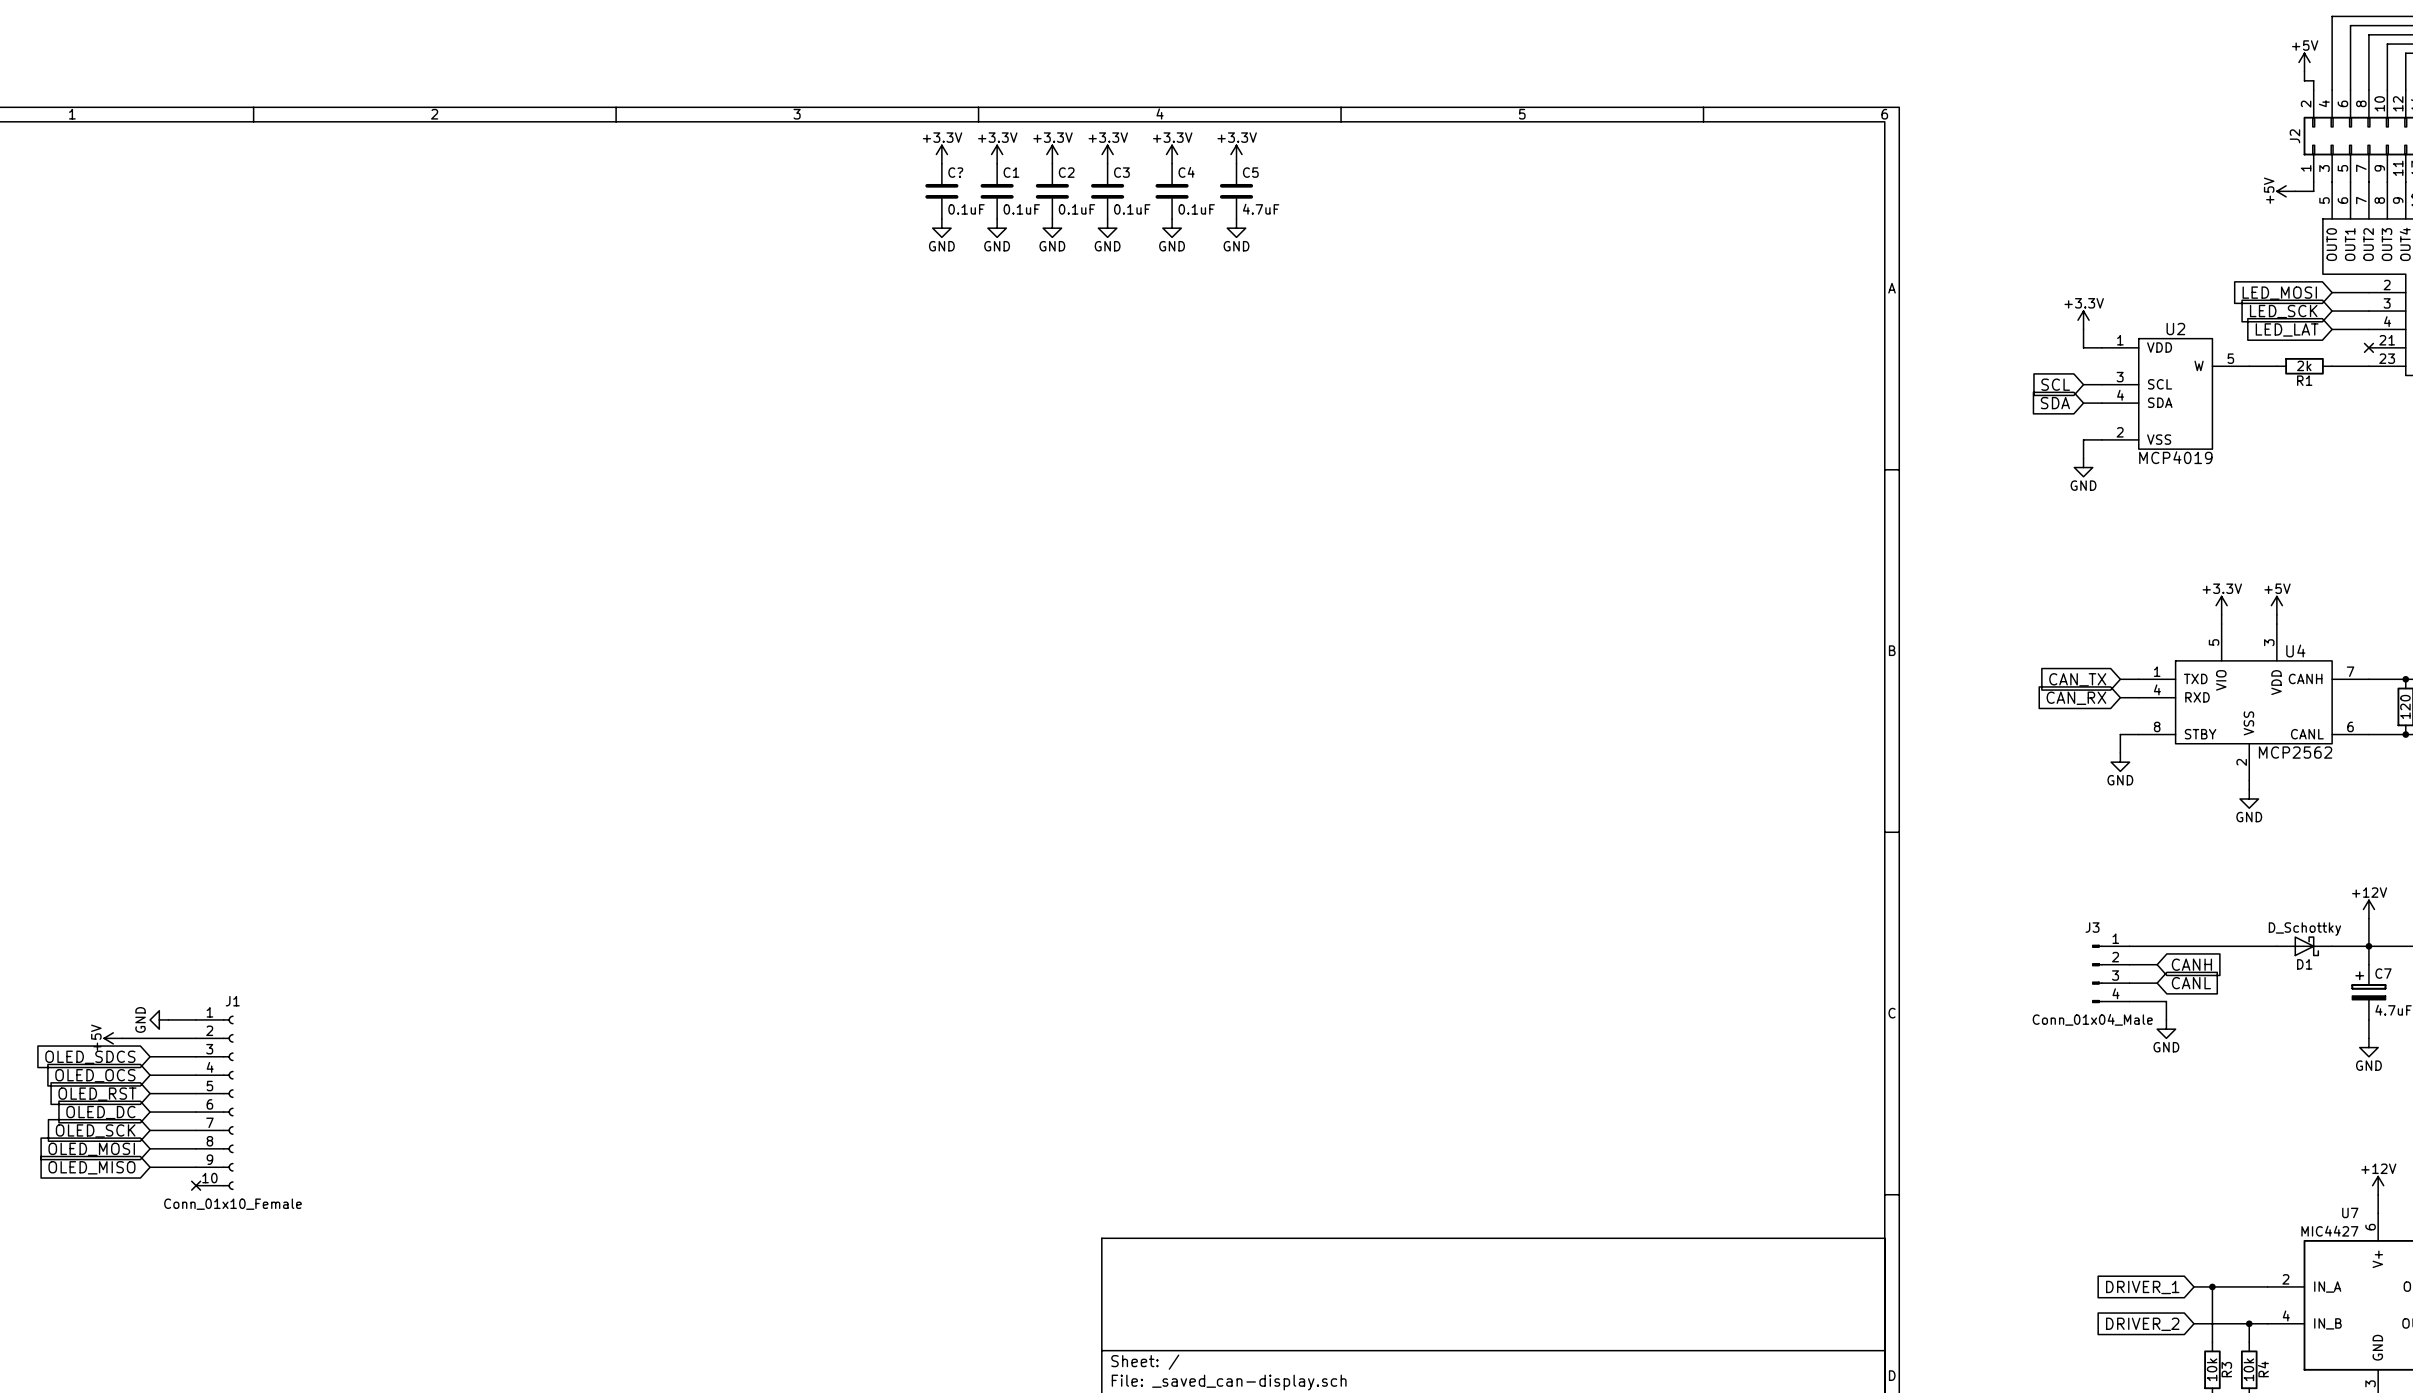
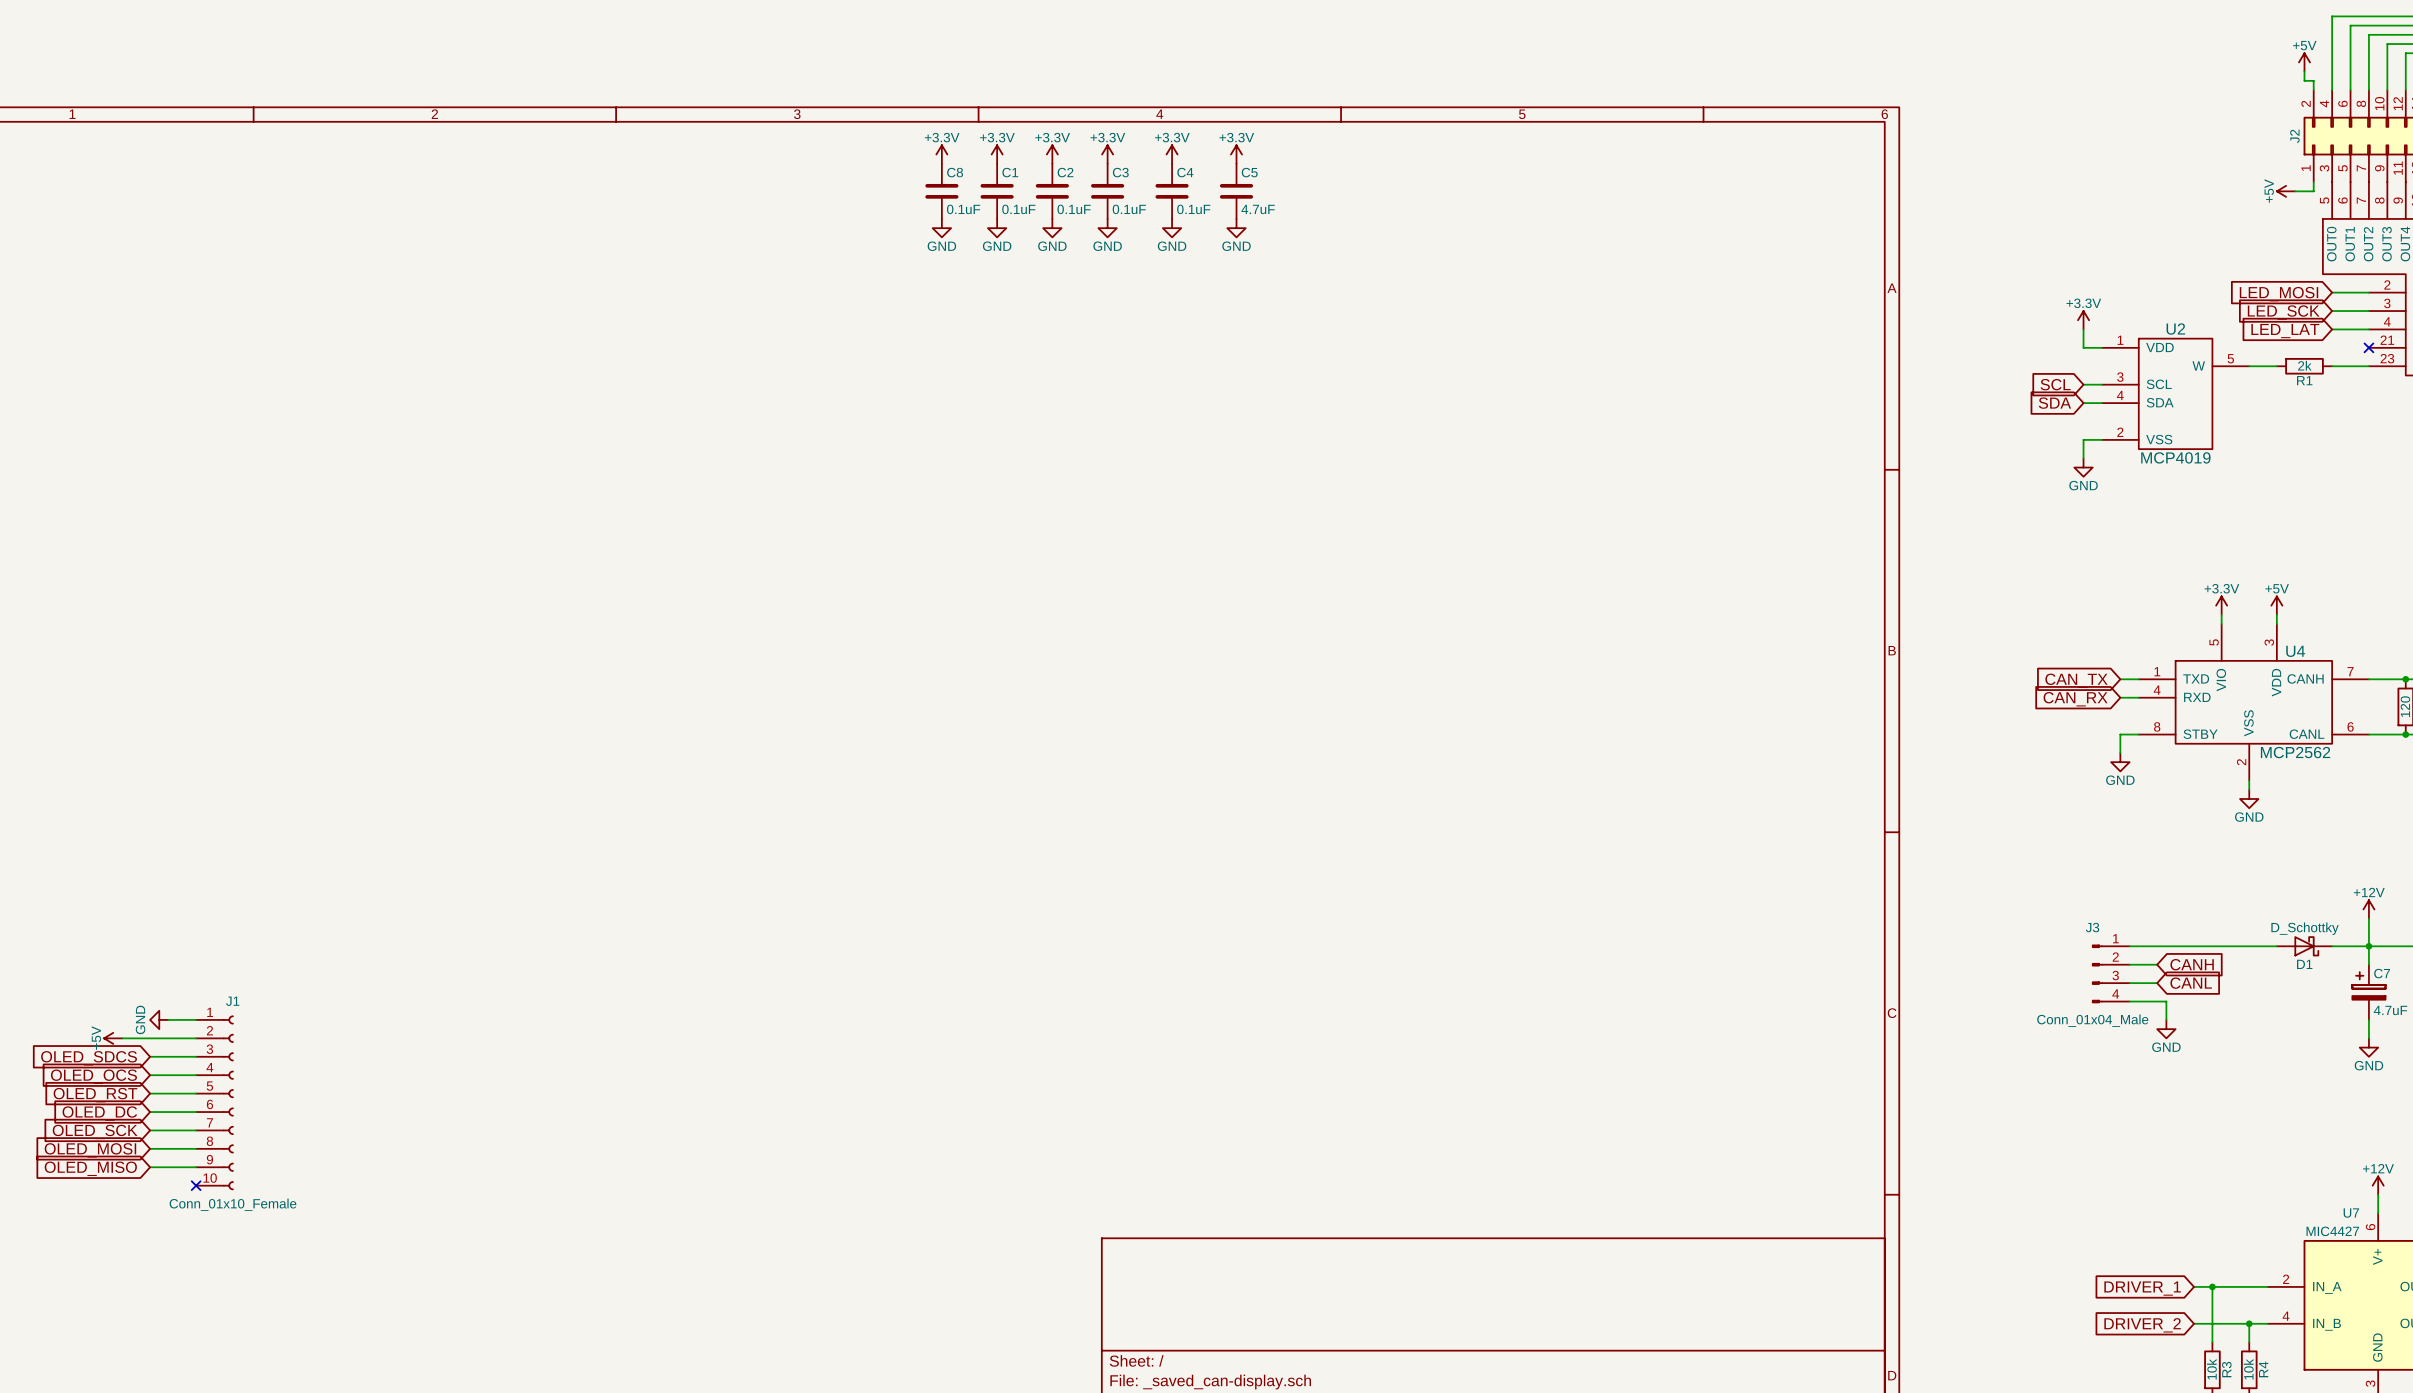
C? name: C? (955, 172) -> C8 (955, 172)

